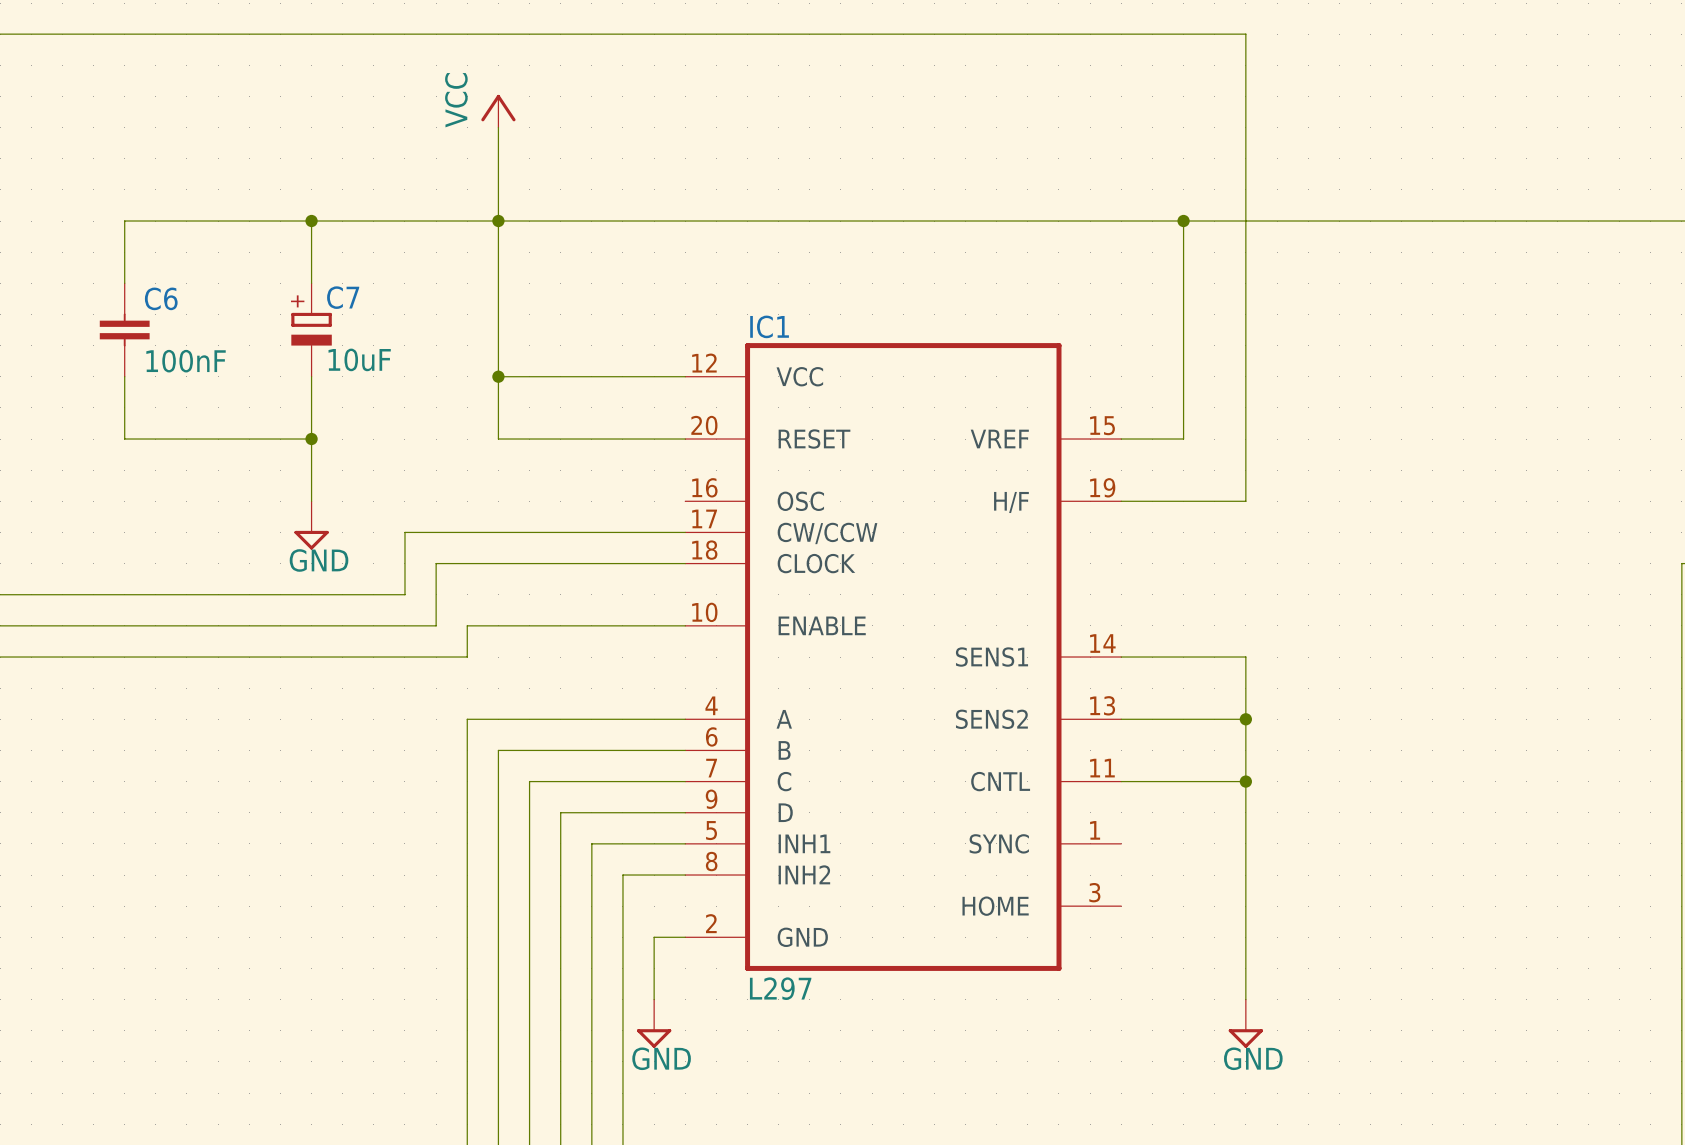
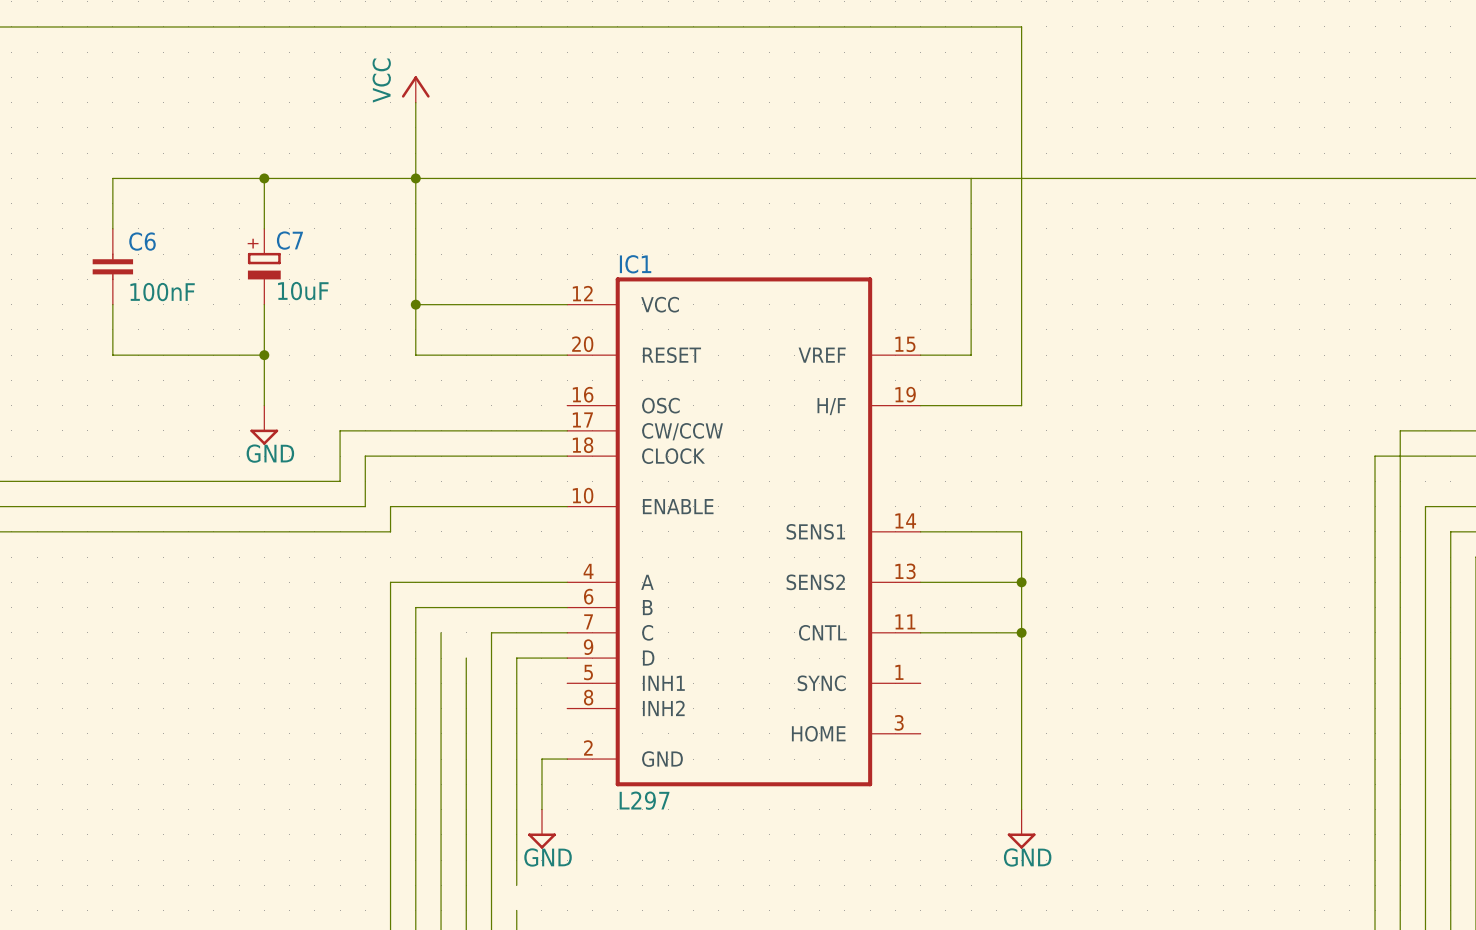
junction: (1183, 221) -> none
wire: (529, 781) (591, 781) -> (491, 683) (491, 632)
wire: (560, 812) (622, 812) -> (516, 708) (516, 658)
wire: (591, 843) (685, 843) -> none
wire: (622, 875) (685, 875) -> none
wire: (622, 1093) (622, 1124) -> none

